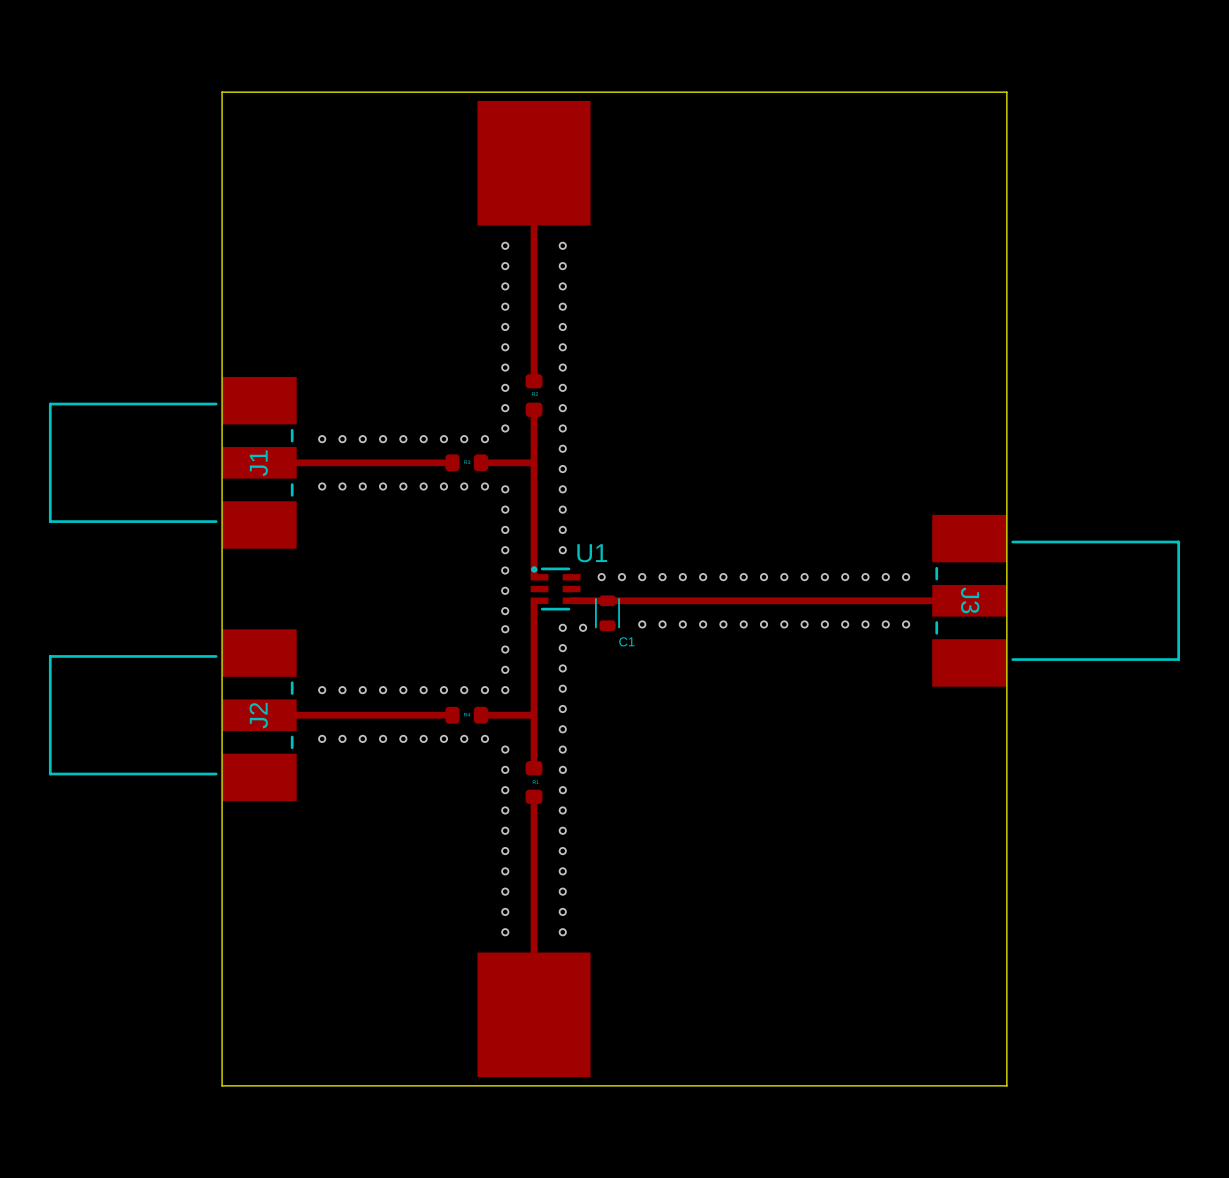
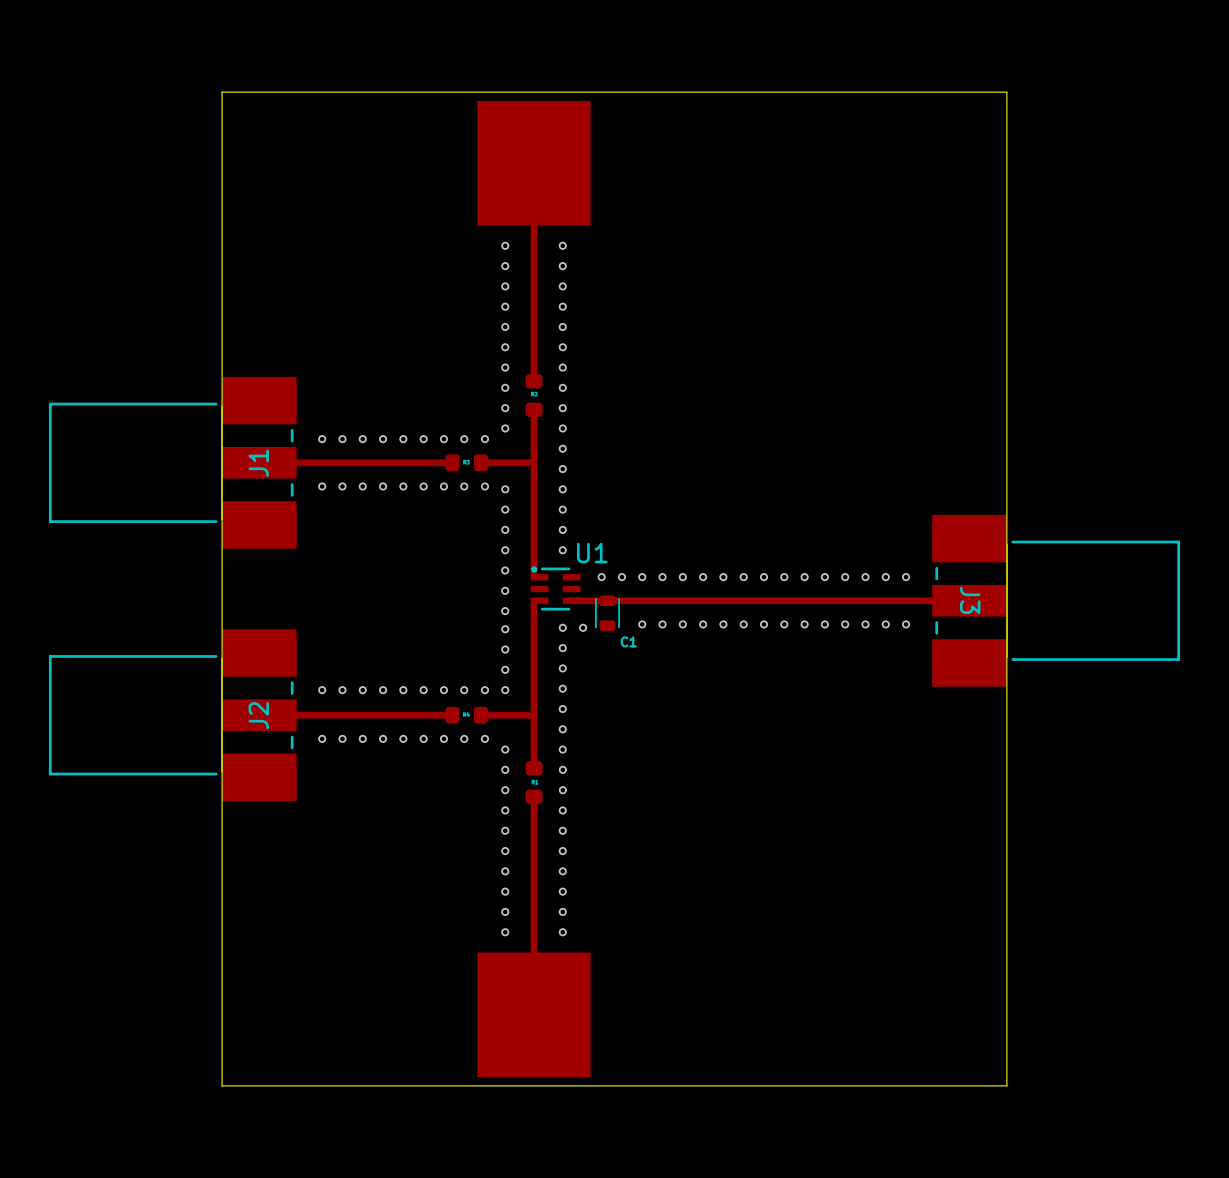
J1 footprint: [48, 376, 297, 549] -> [48, 376, 297, 549]
J3 footprint: [932, 514, 1181, 687] -> [932, 514, 1181, 687]
J2 footprint: [48, 629, 297, 802] -> [48, 629, 297, 802]

